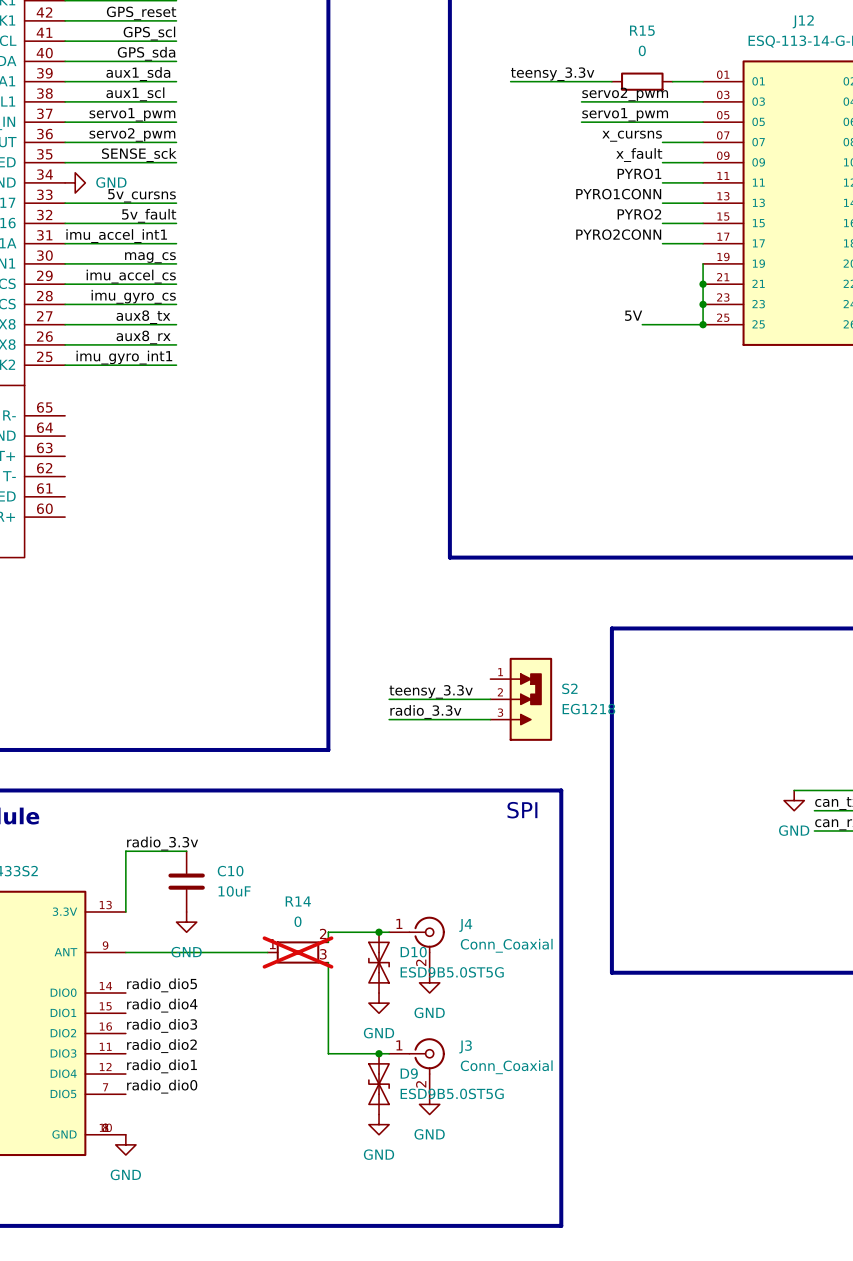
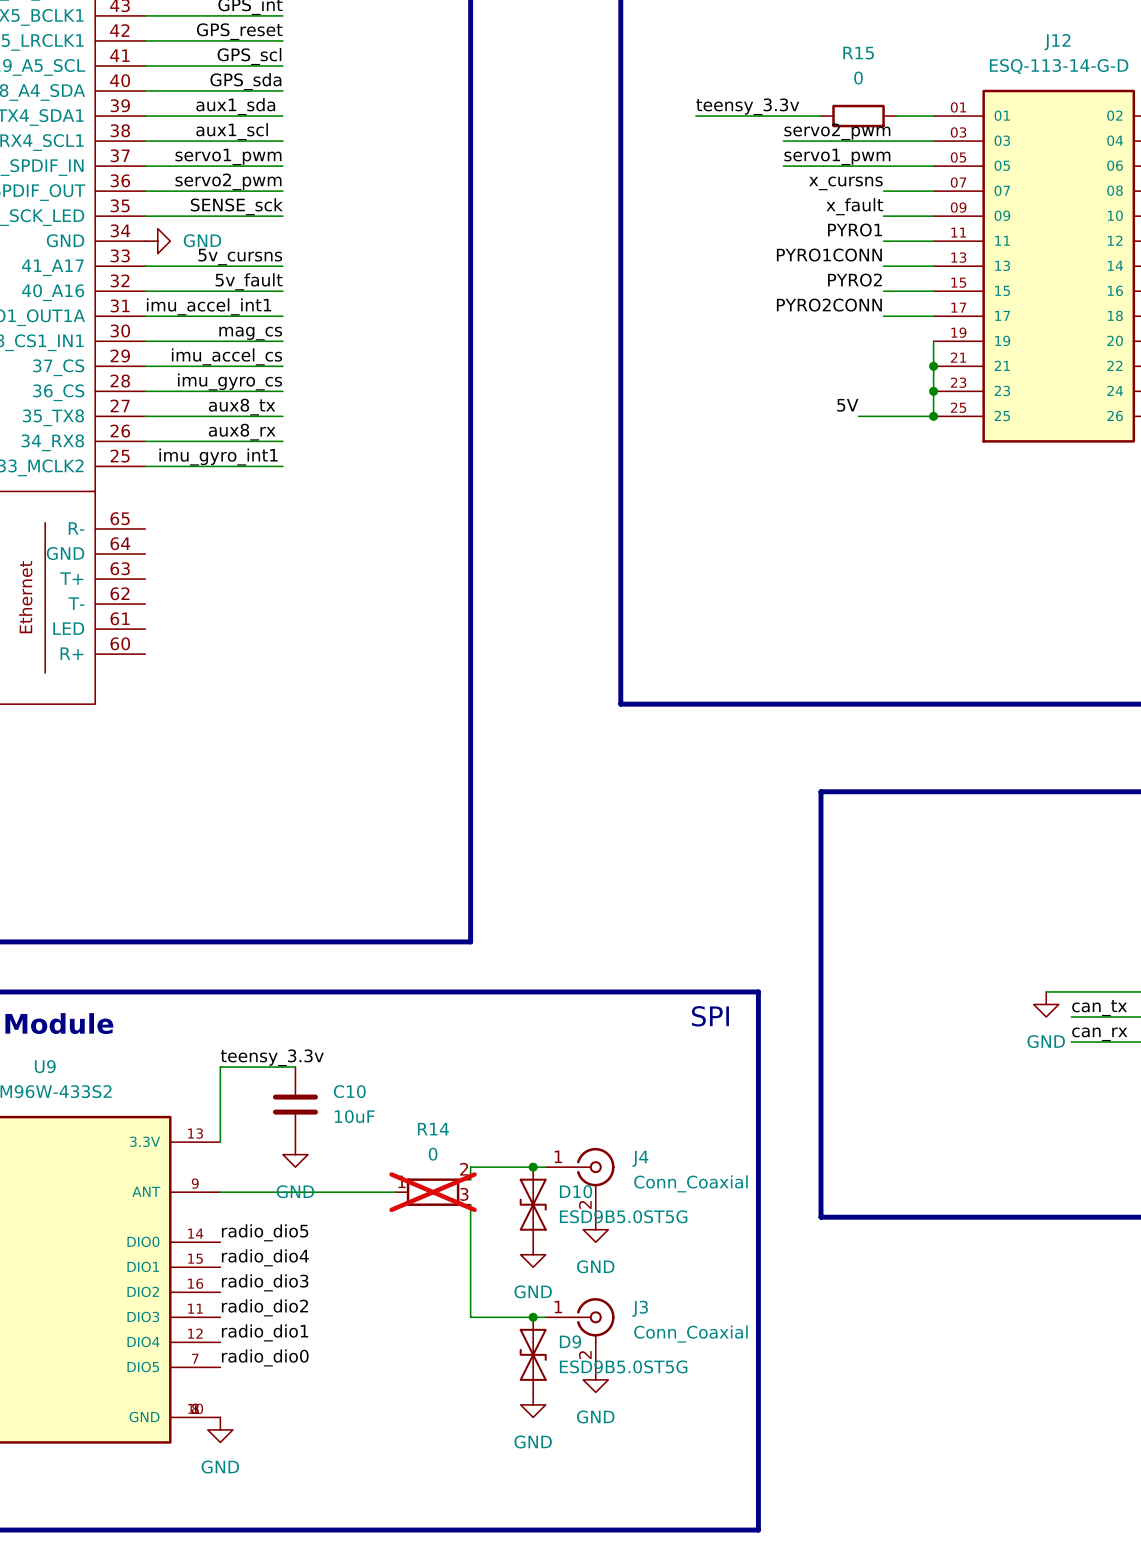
label: teensy_3.3v (431, 691) -> none
wire: (389, 699) (490, 699) -> none
S2: EG1218 (521, 699) -> none
label: radio_3.3v (425, 711) -> none
wire: (389, 719) (490, 719) -> none
label: radio_3.3v (162, 843) -> teensy_3.3v (272, 1057)

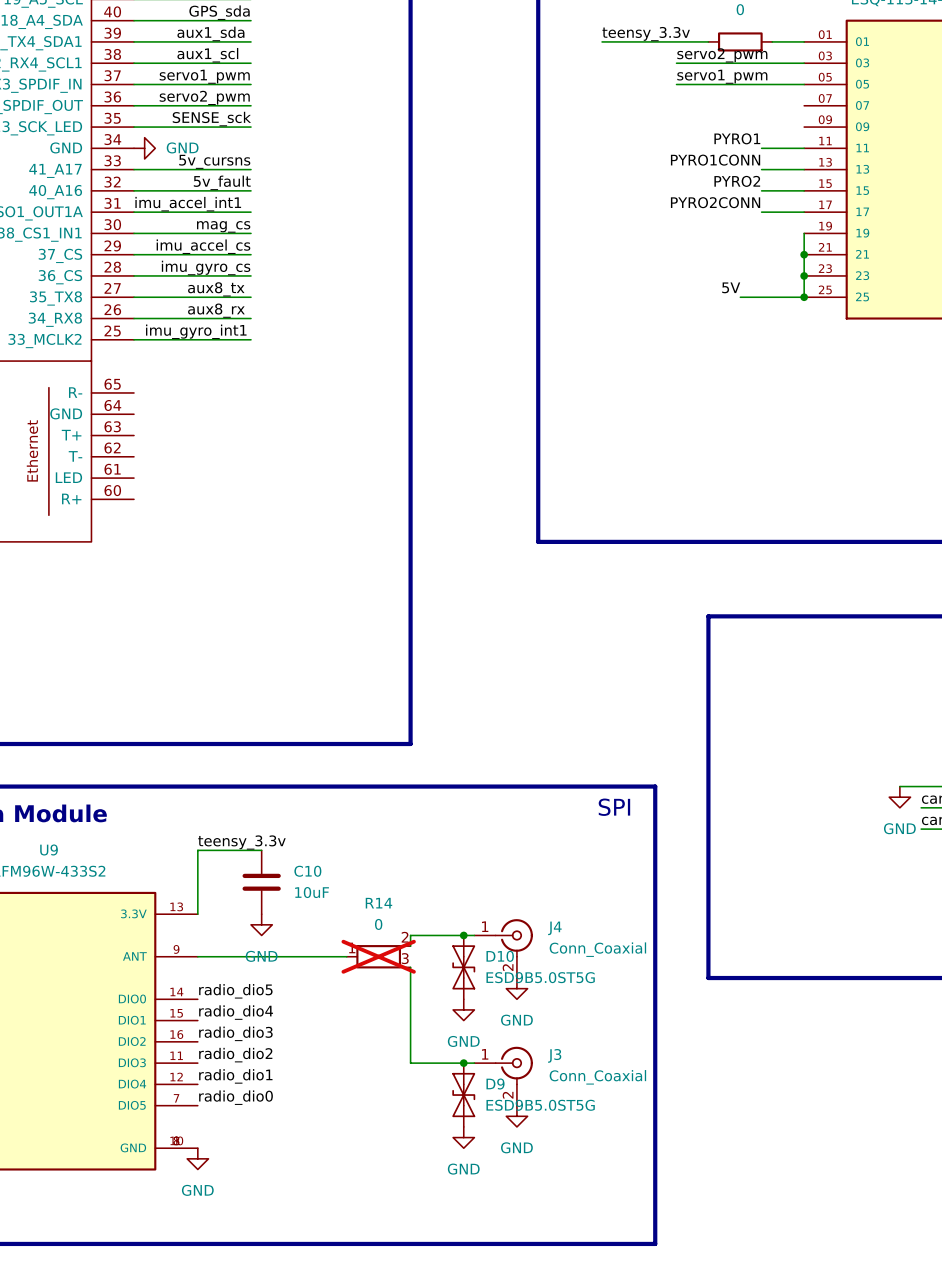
label: x_cursns (845, 183) -> none
wire: (883, 191) (933, 191) -> none
label: x_fault (854, 206) -> none
wire: (883, 216) (933, 216) -> none

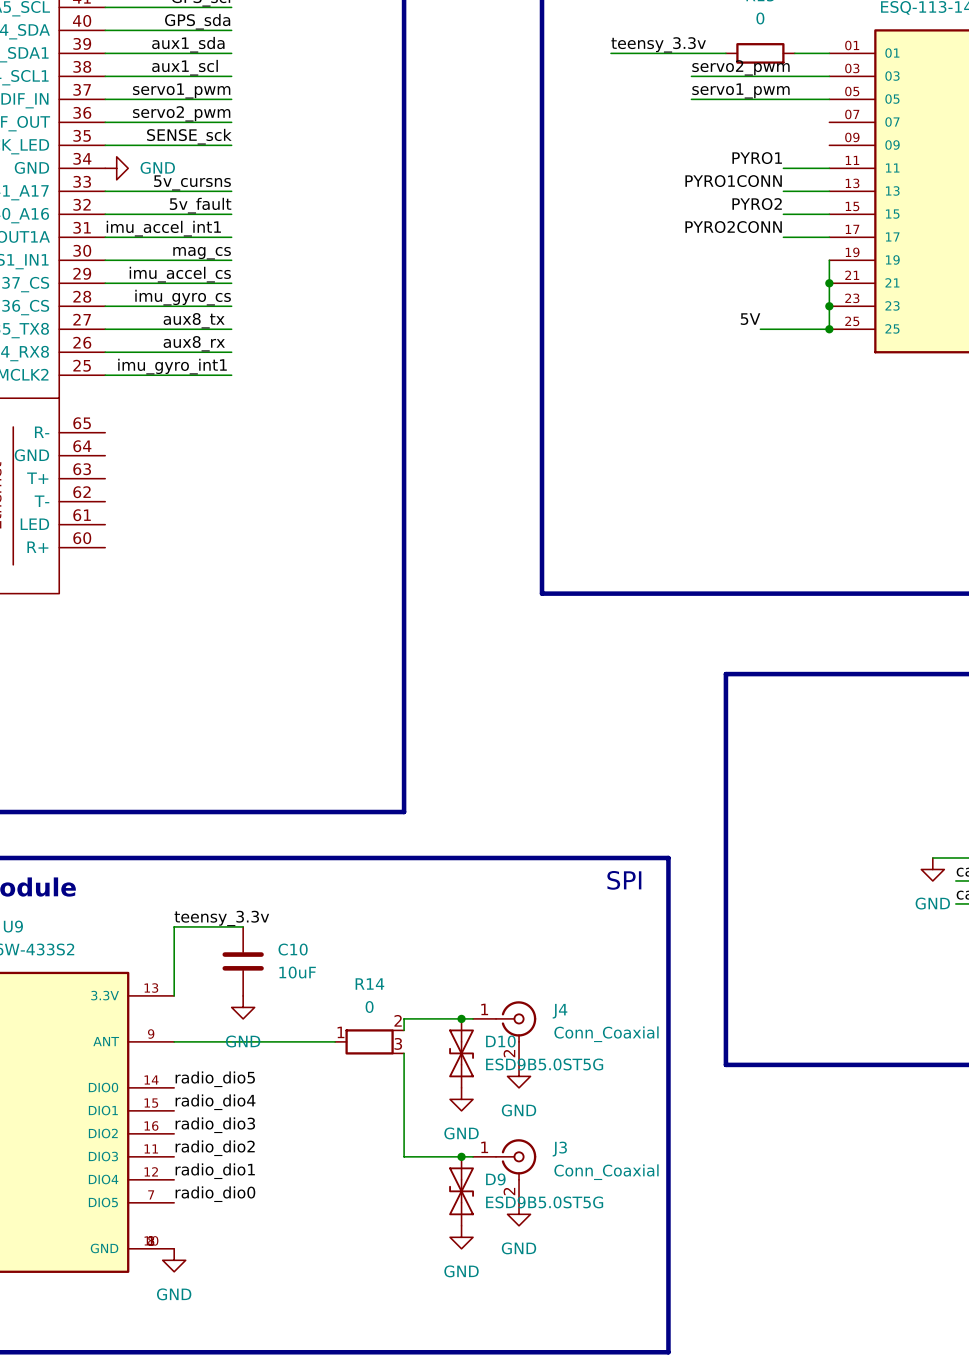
R14 do-not-place cross: (378, 956) -> none

